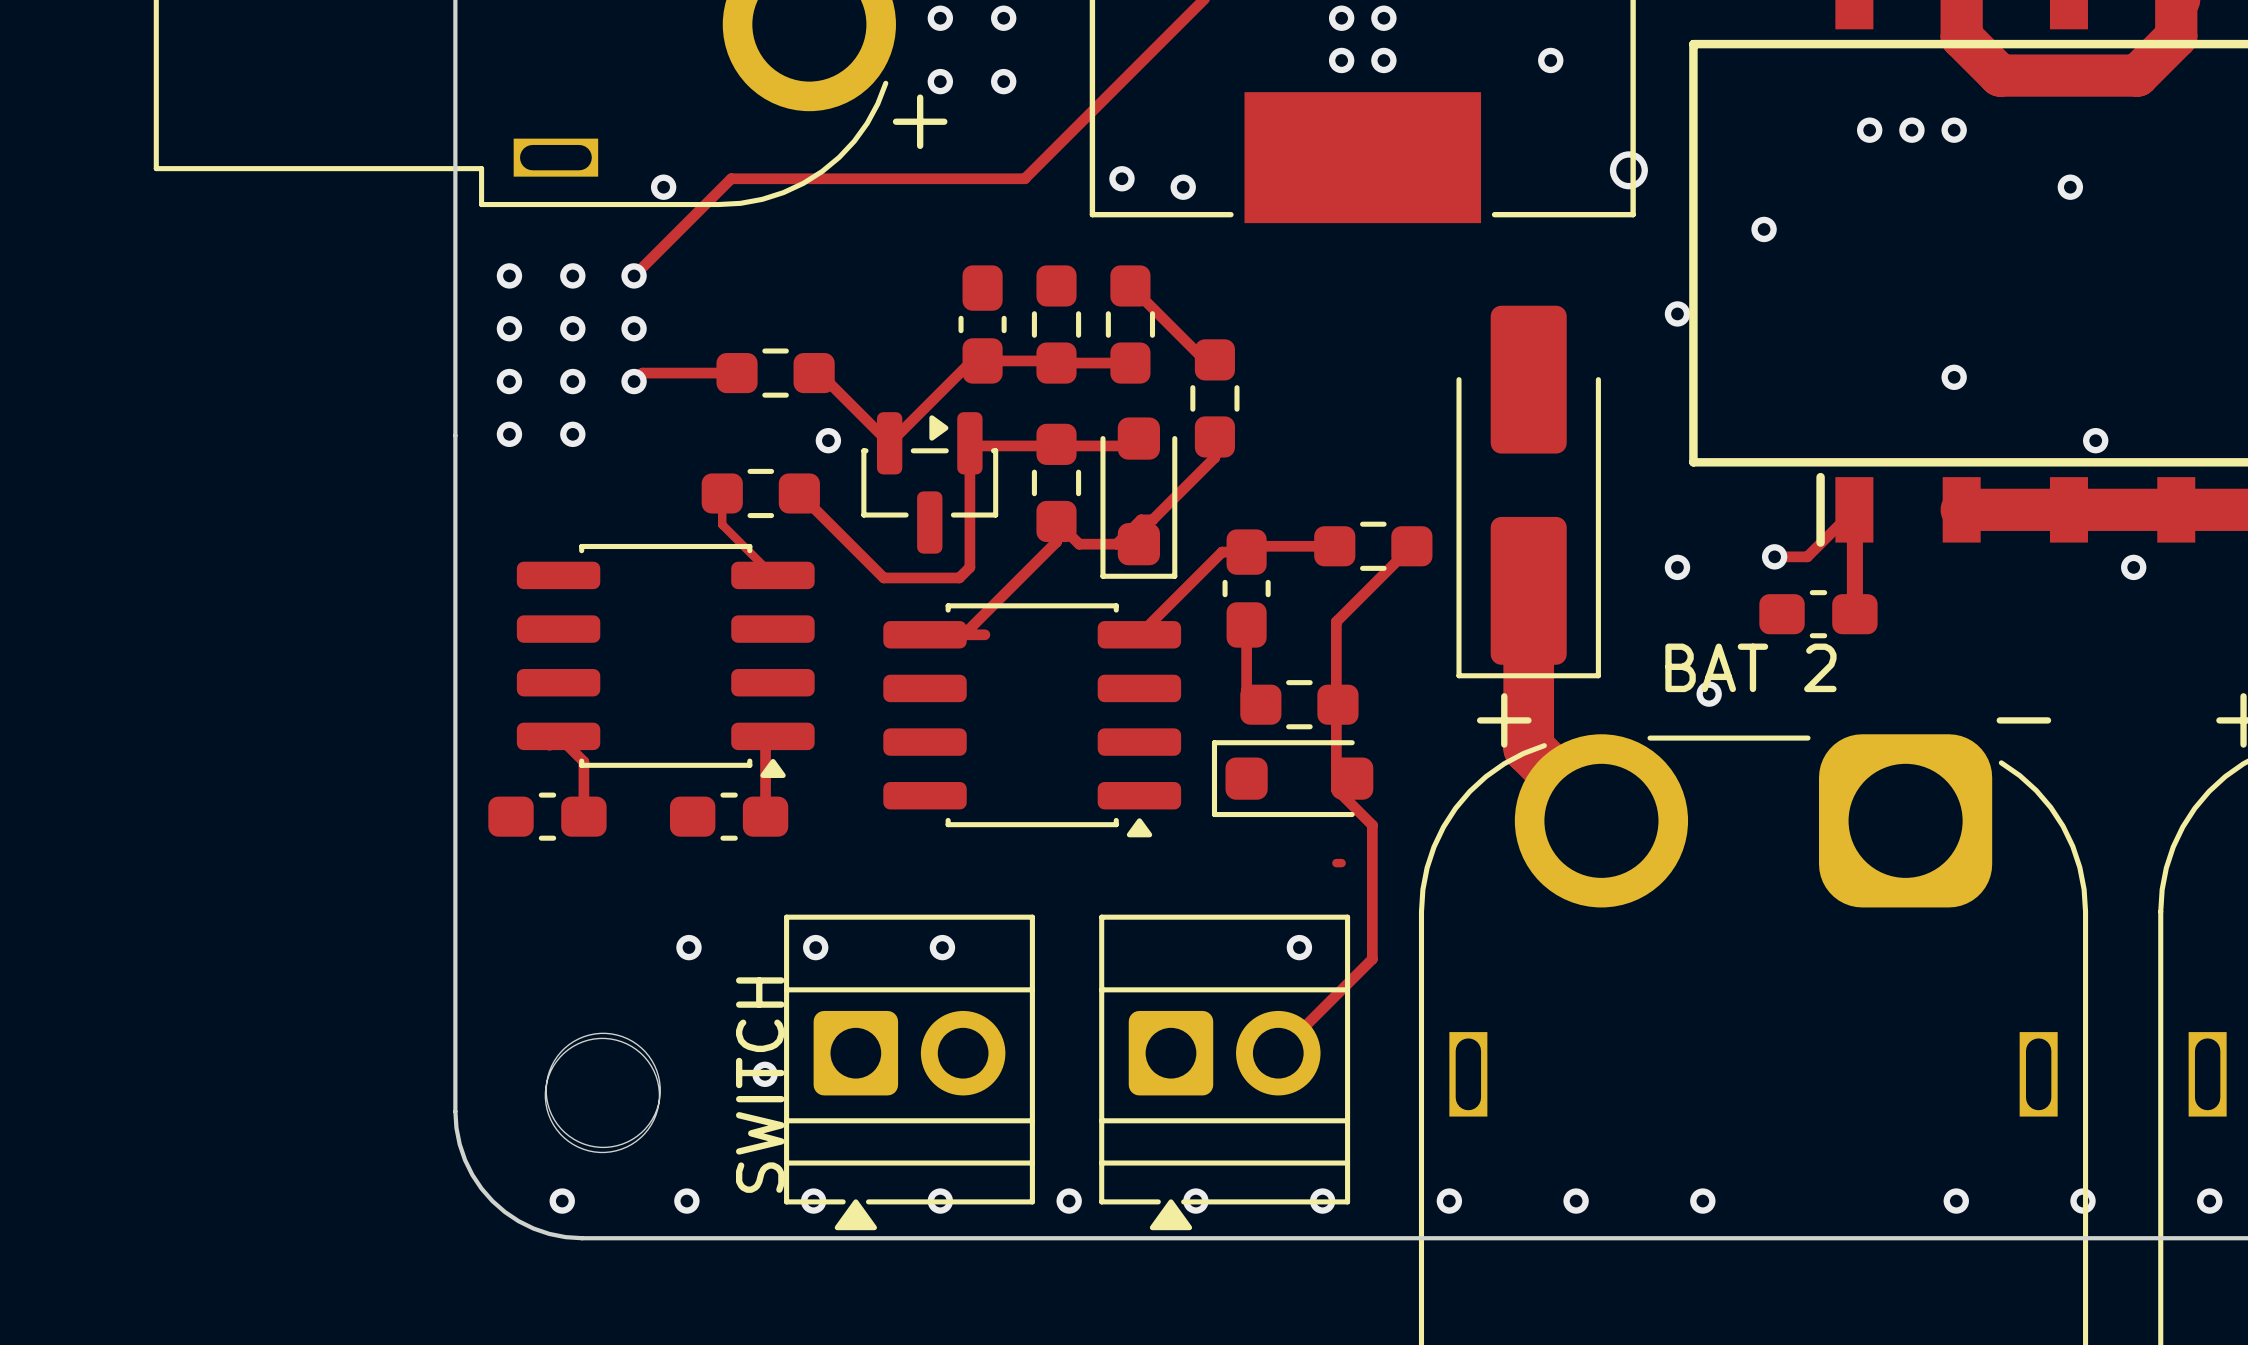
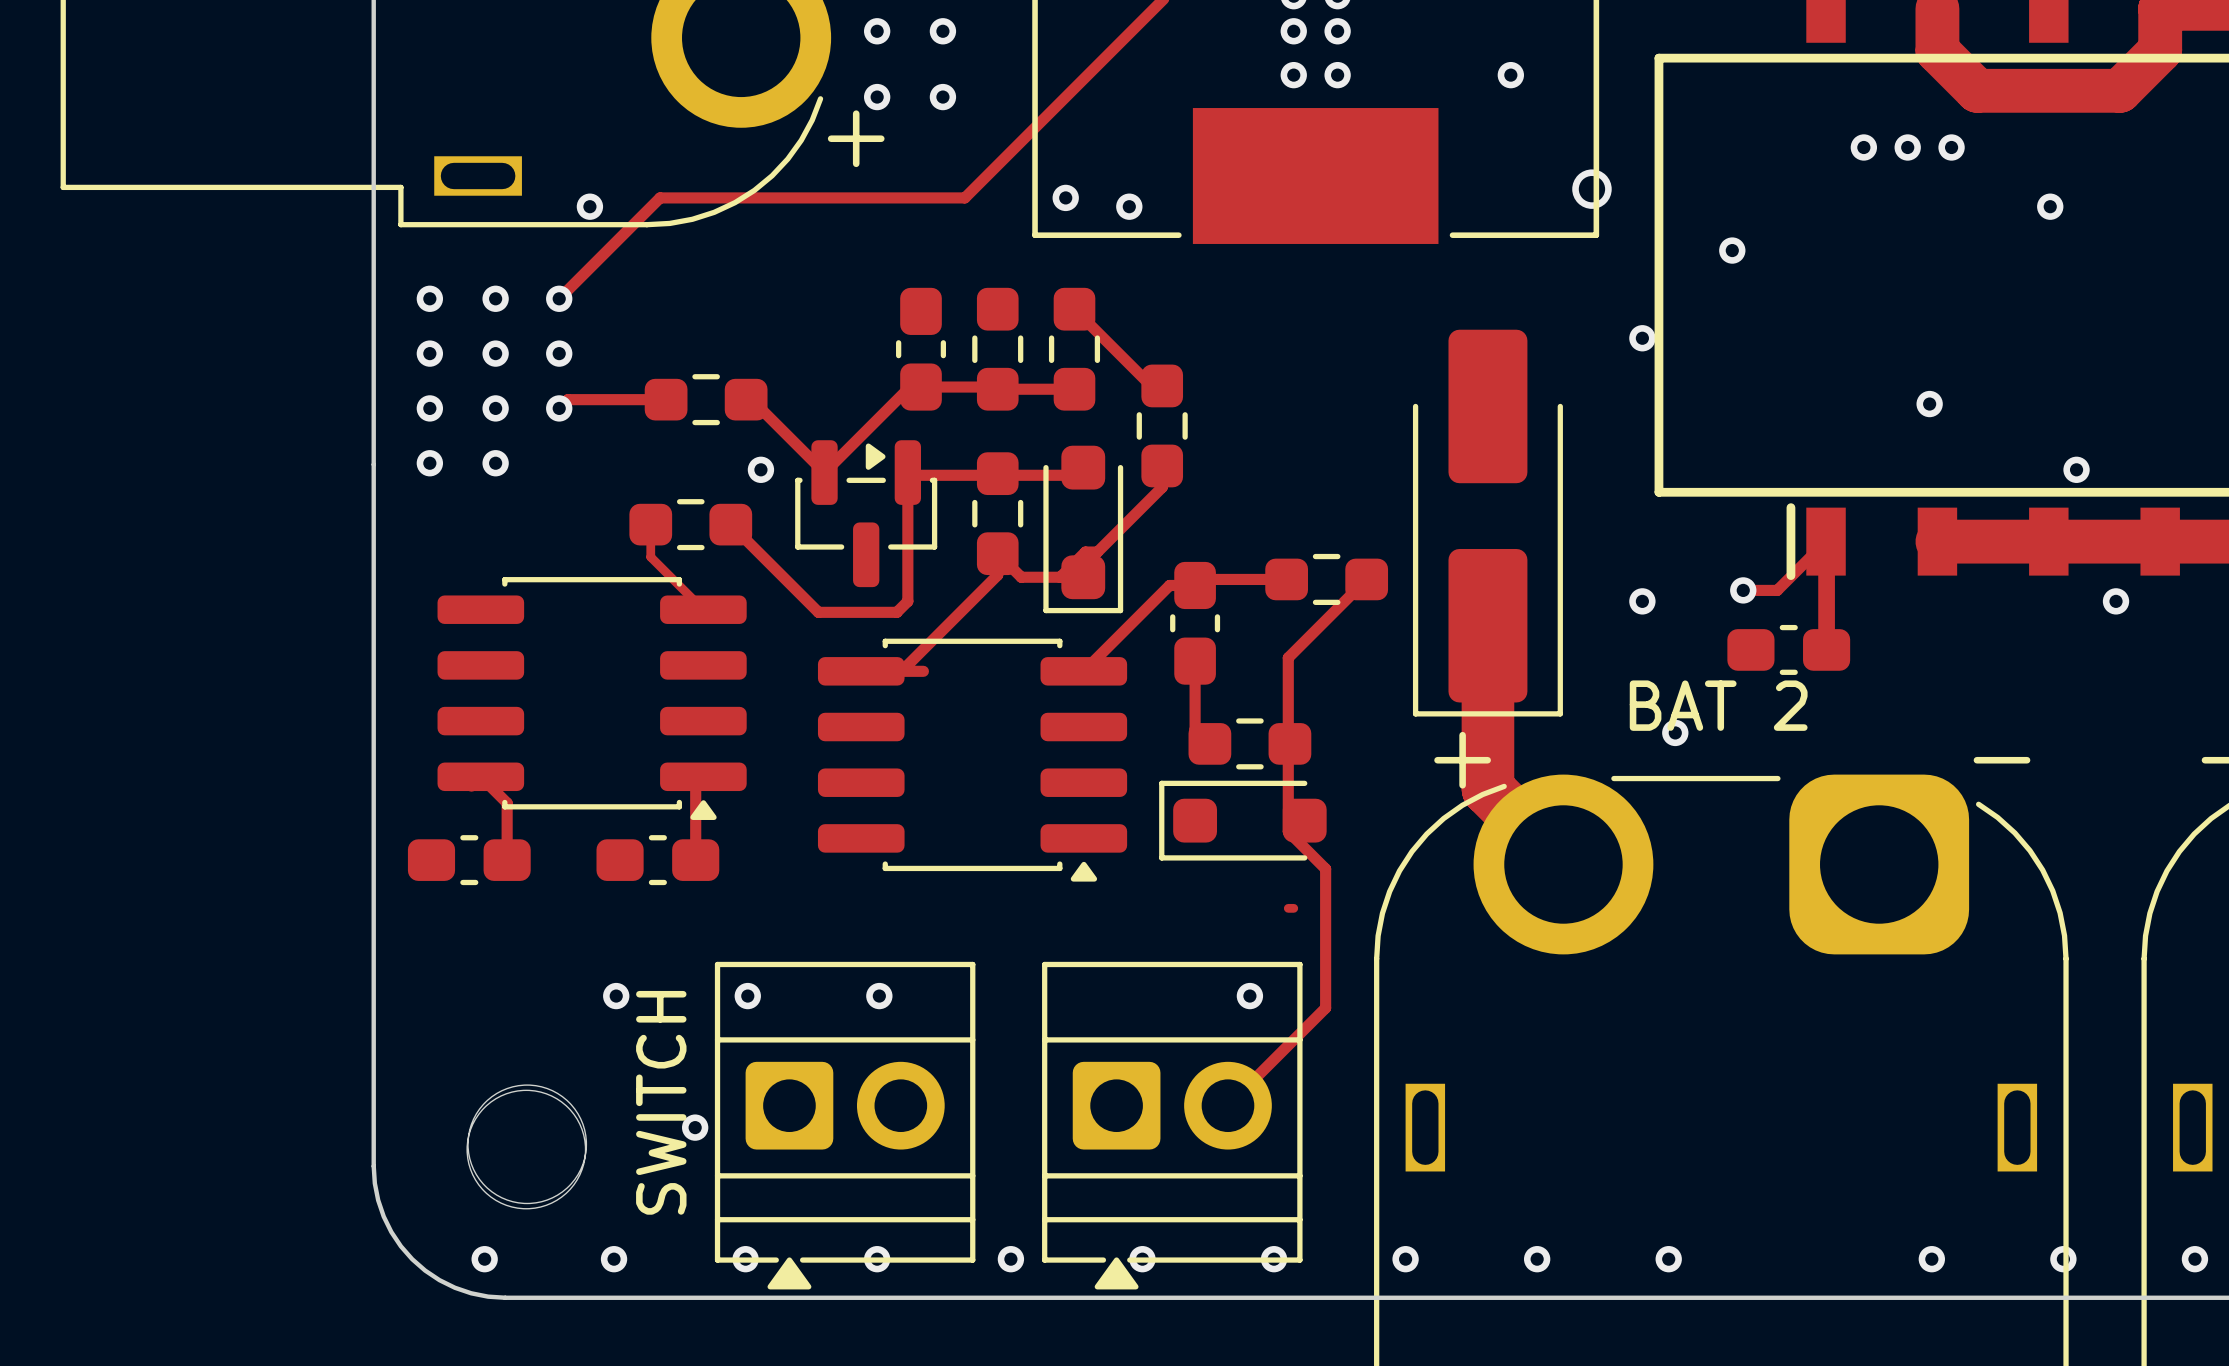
via: (1869, 130) -> none
via: none -> (1863, 147)
via: (1911, 130) -> none
via: none -> (1907, 147)
via: (1954, 130) -> none
via: none -> (1951, 147)
text position: SWITCH (760, 1085) -> SWITCH (661, 1102)

